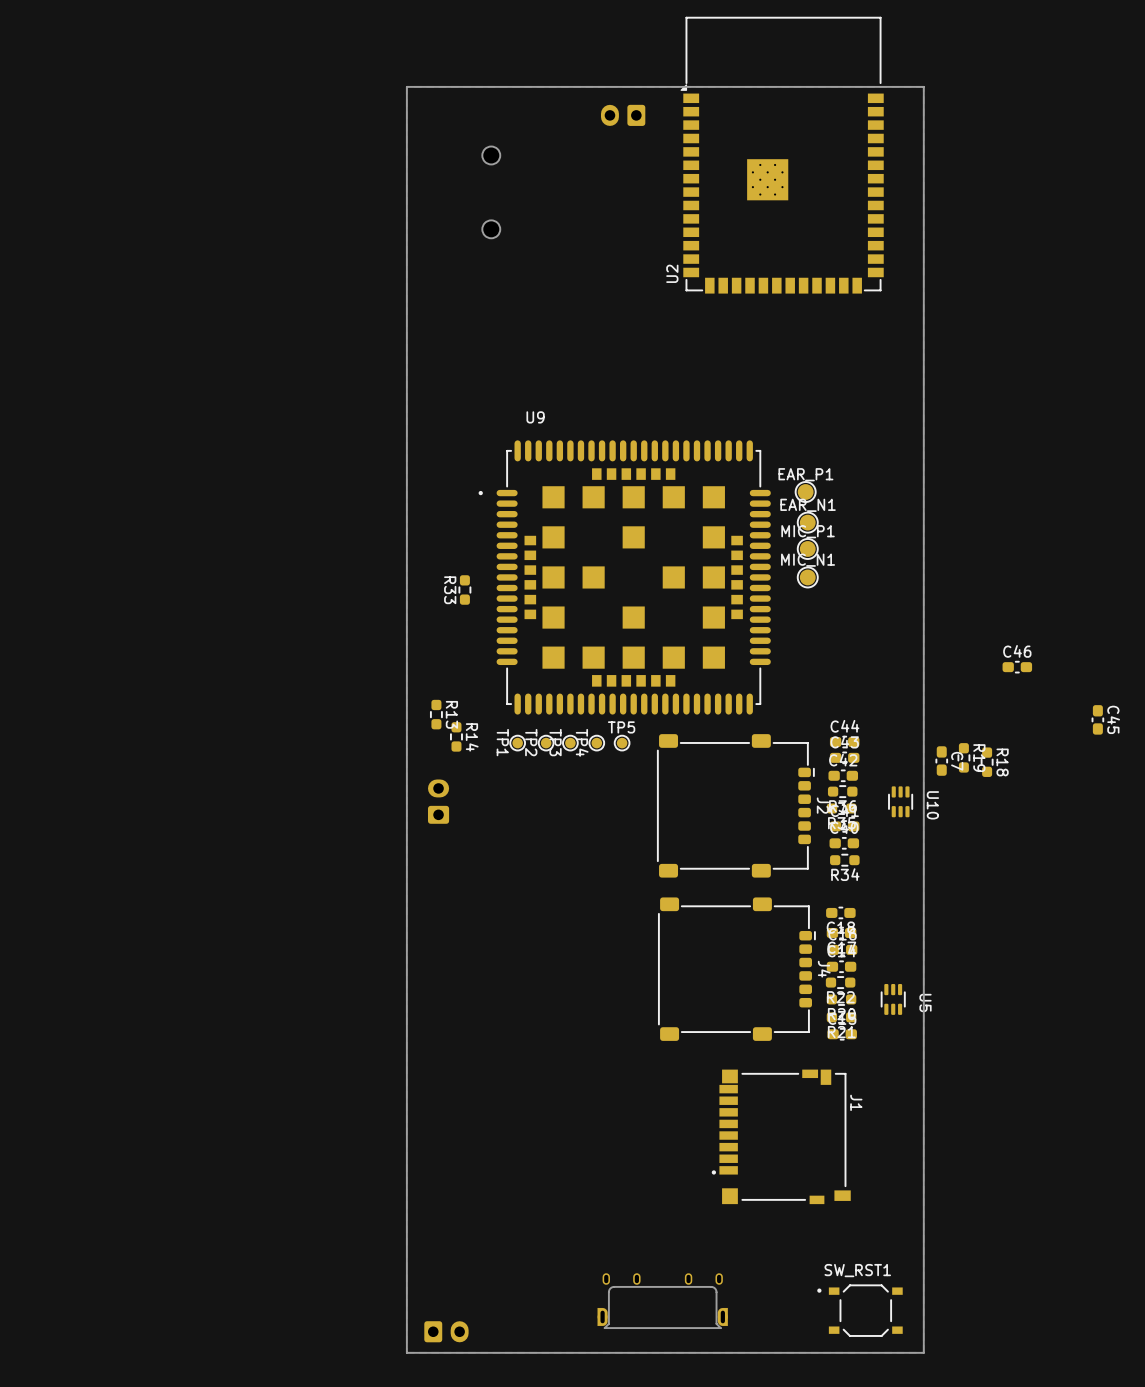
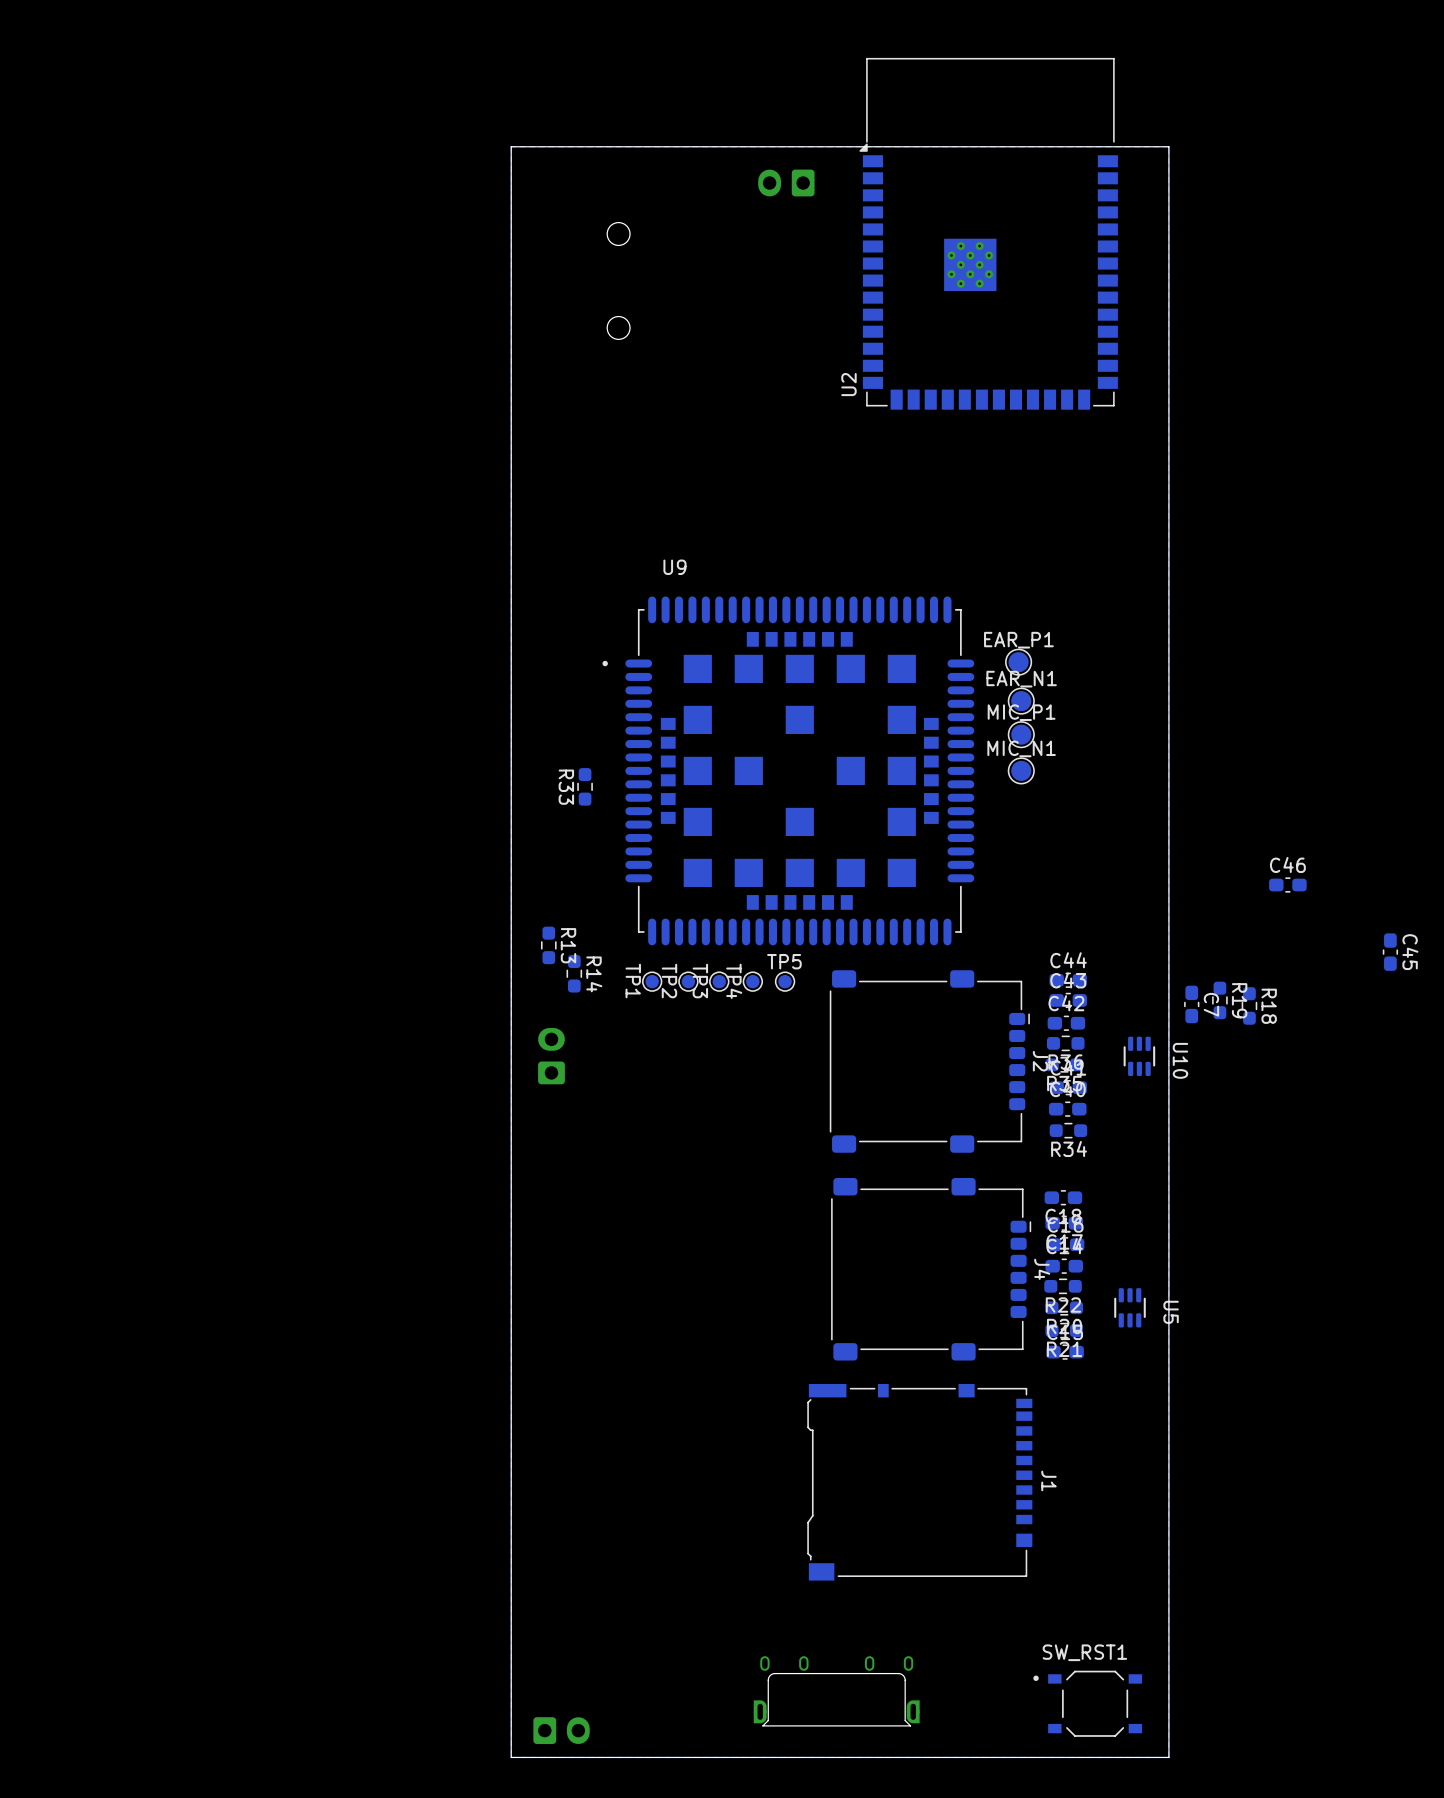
J1 footprint: [711, 1069, 851, 1205] -> [807, 1383, 1033, 1581]
J1 name position: J1 (856, 1102) -> J1 (1048, 1480)

